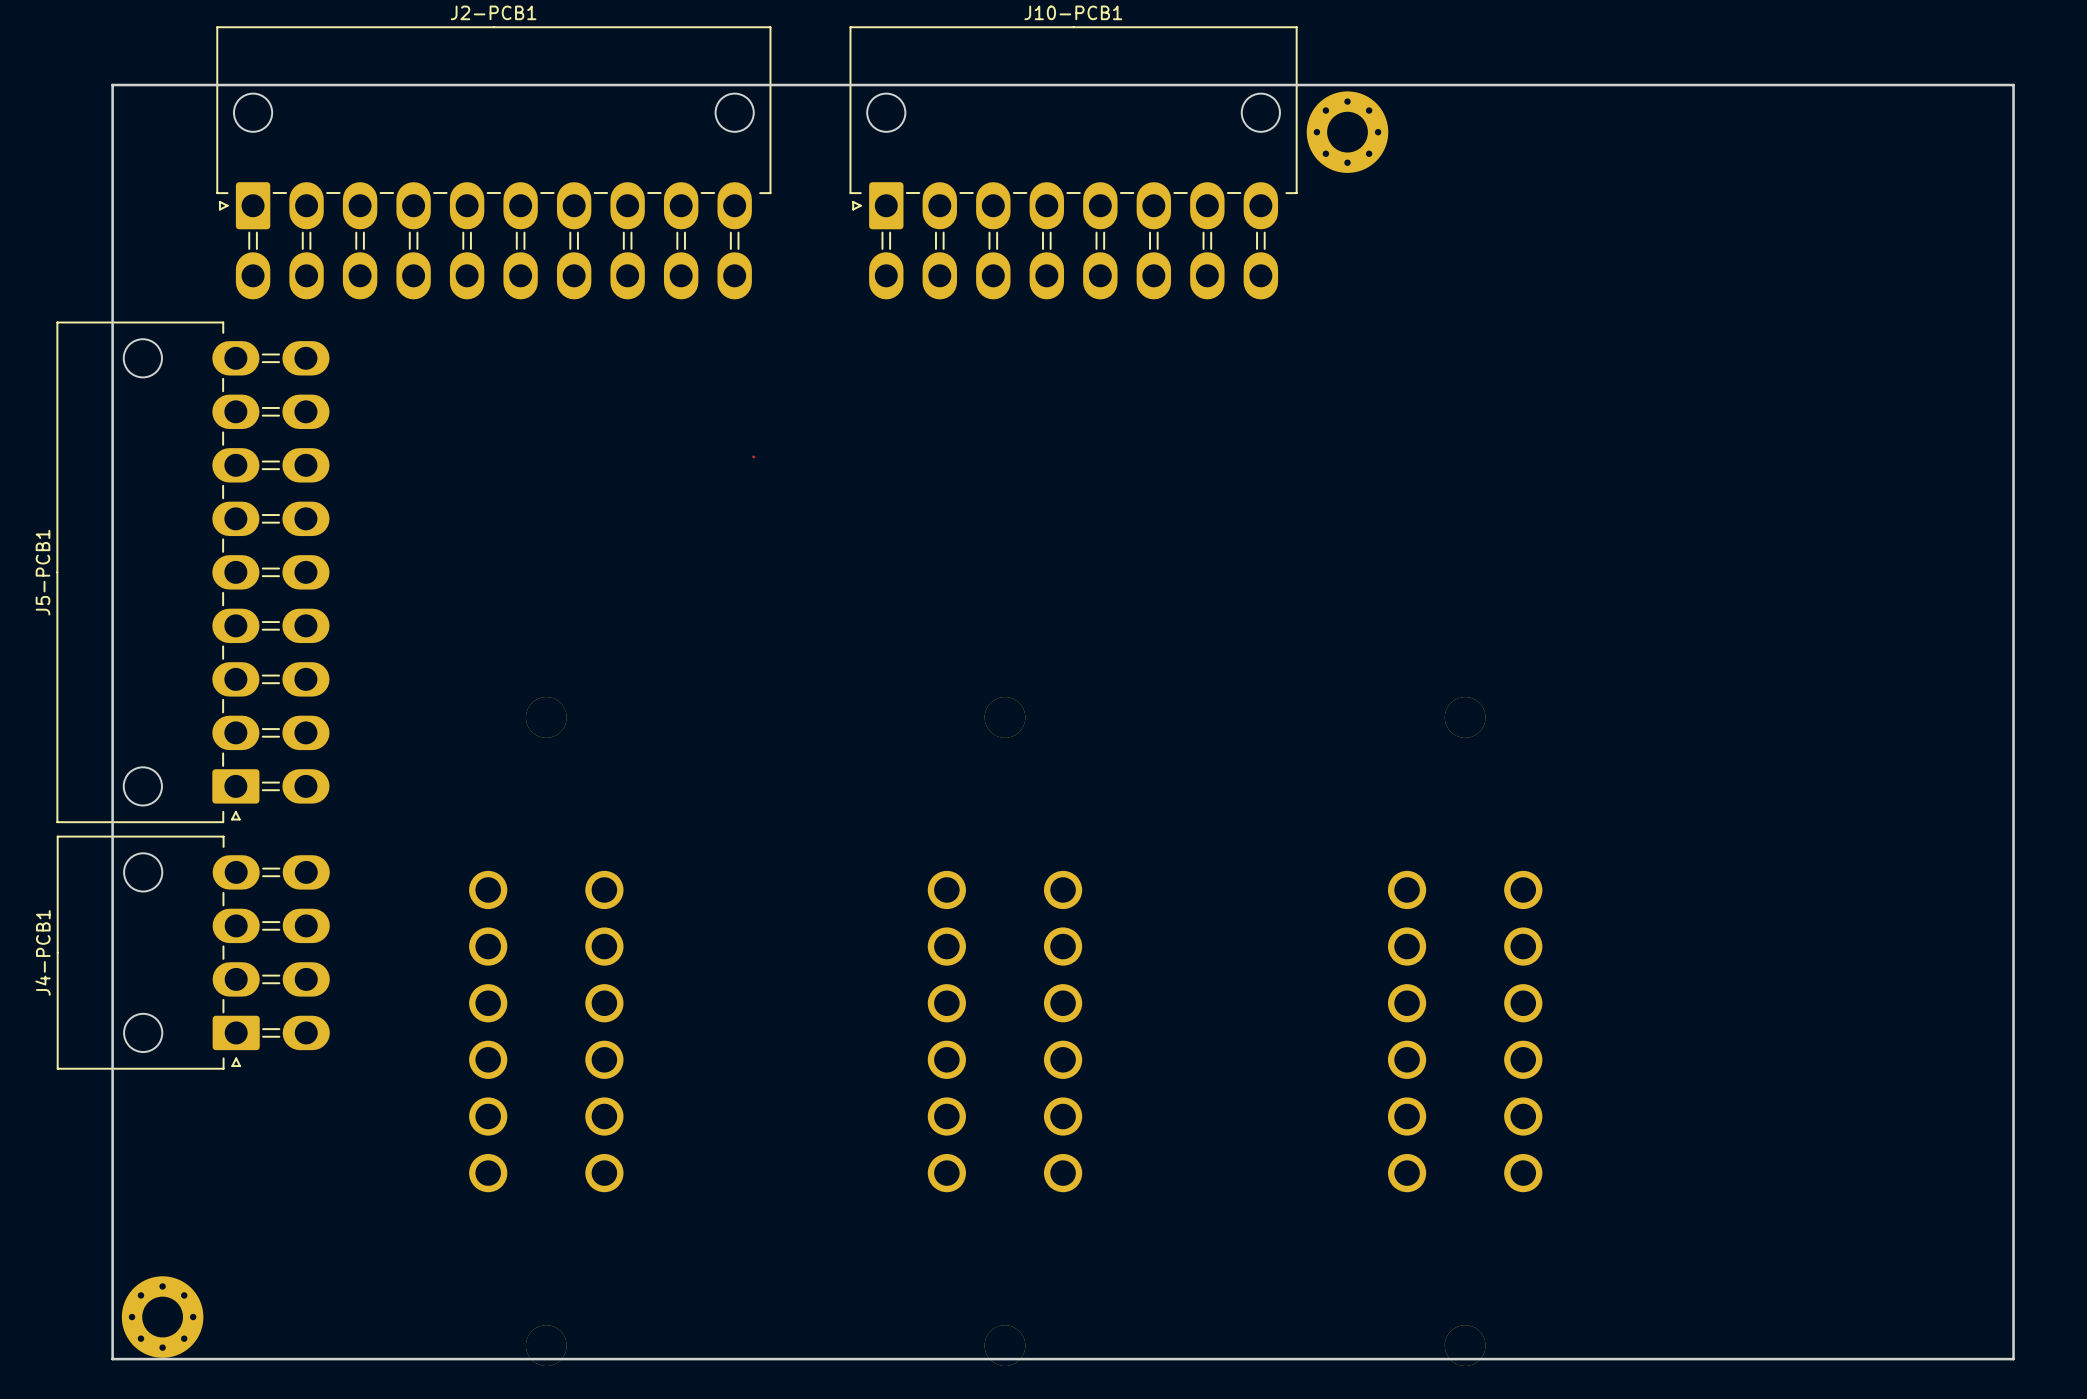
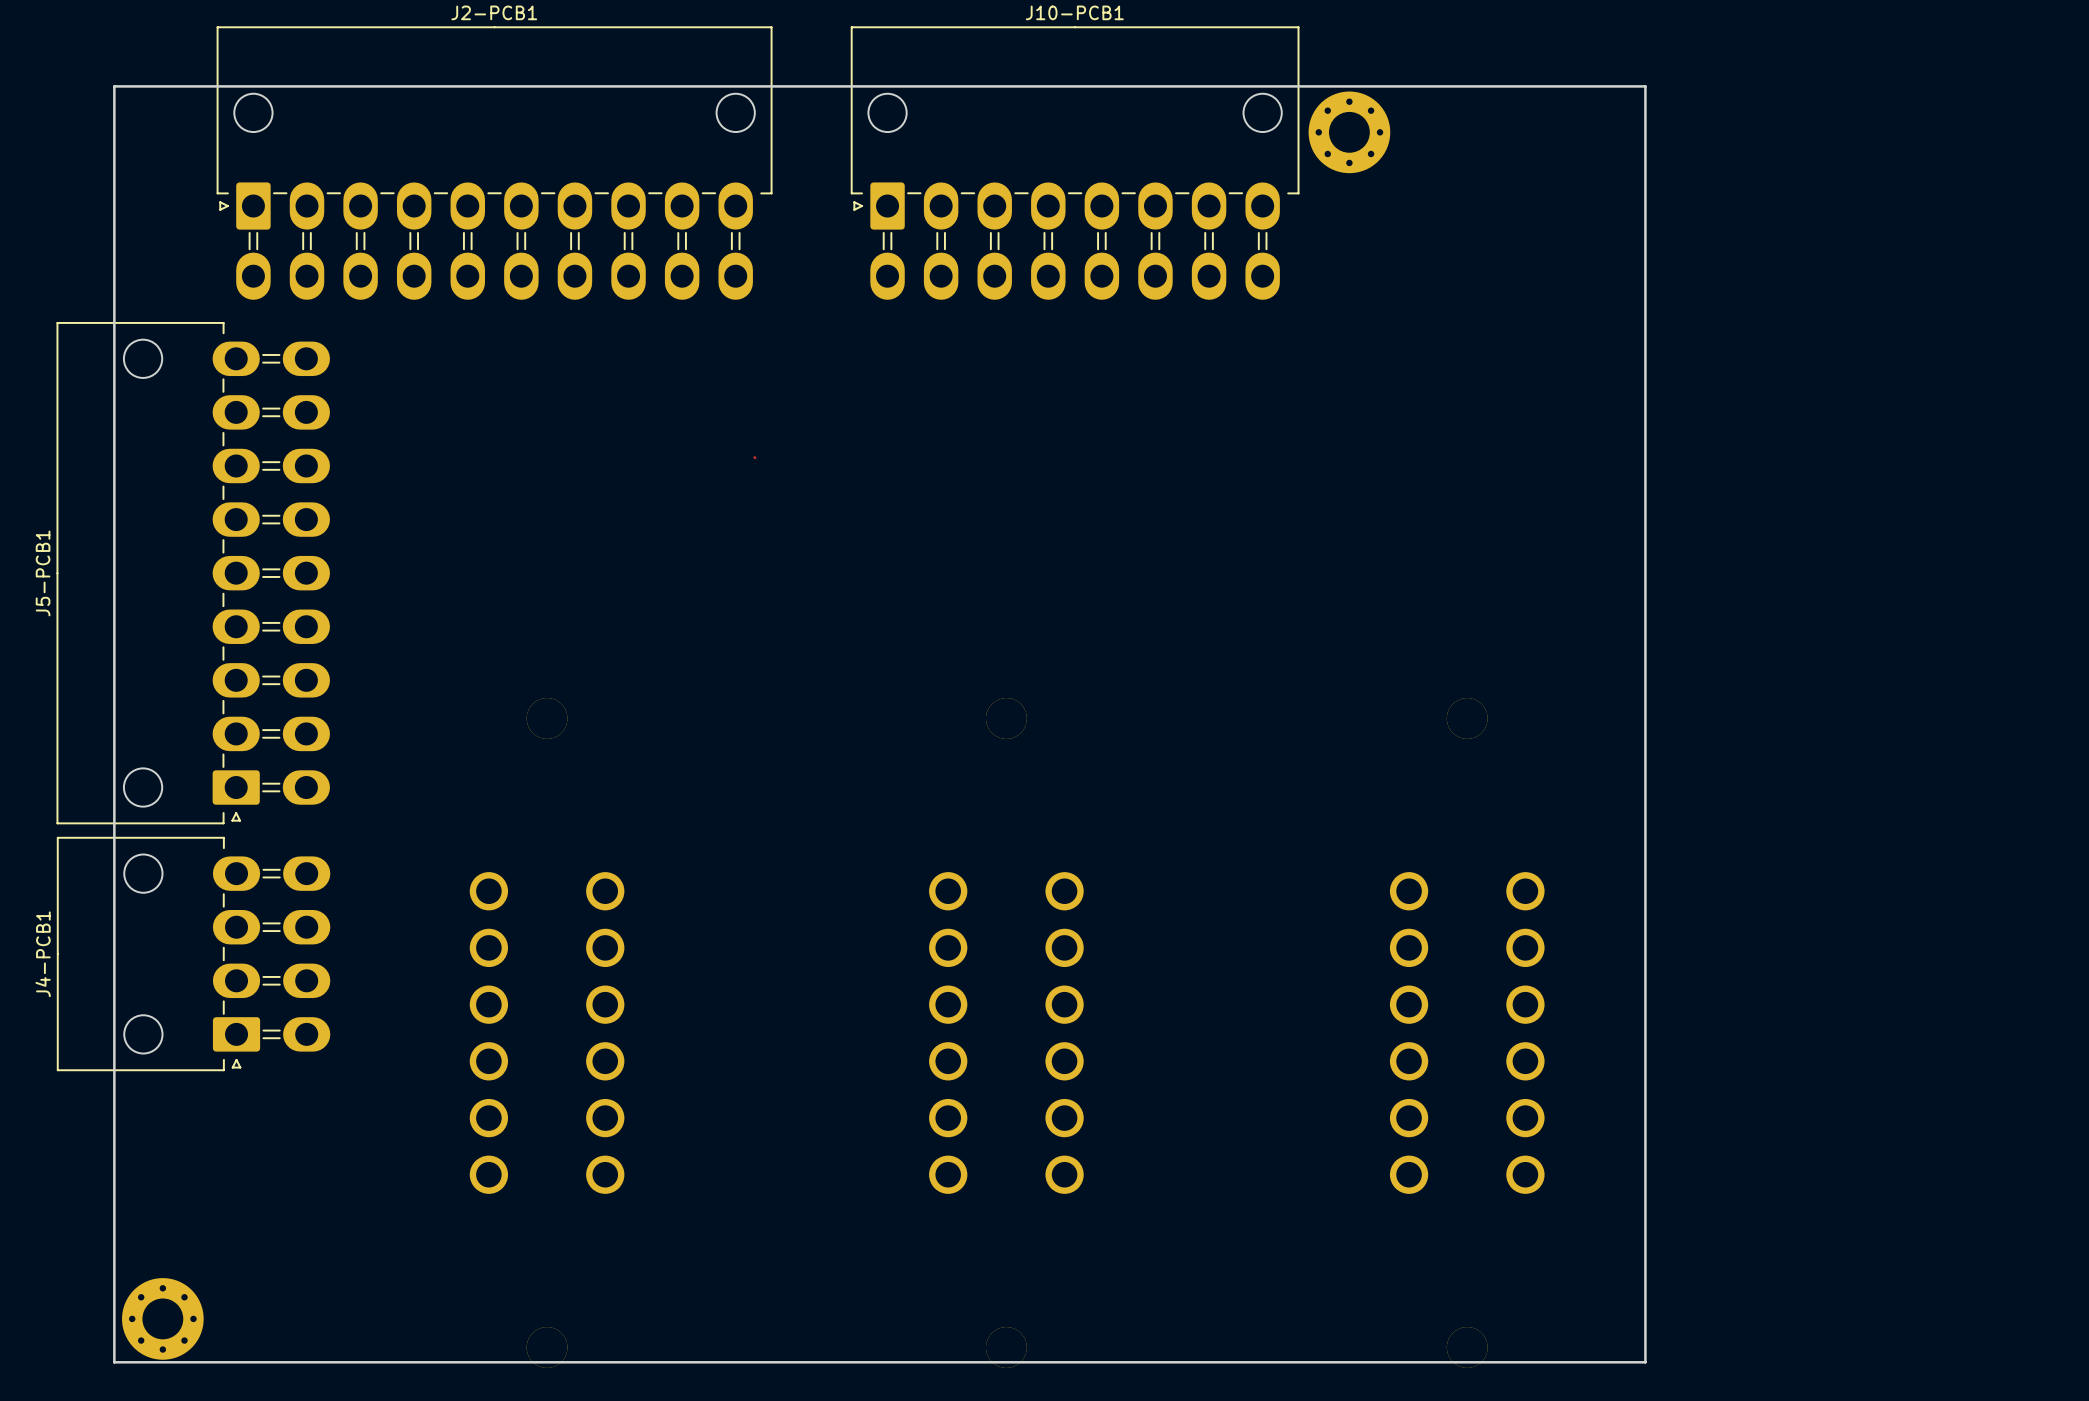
board edge: (112, 85) (2013, 85) (2013, 1359) (112, 1359) (112, 85) -> (114, 86) (114, 1362) (1645, 1362) (1645, 86) (114, 86)

